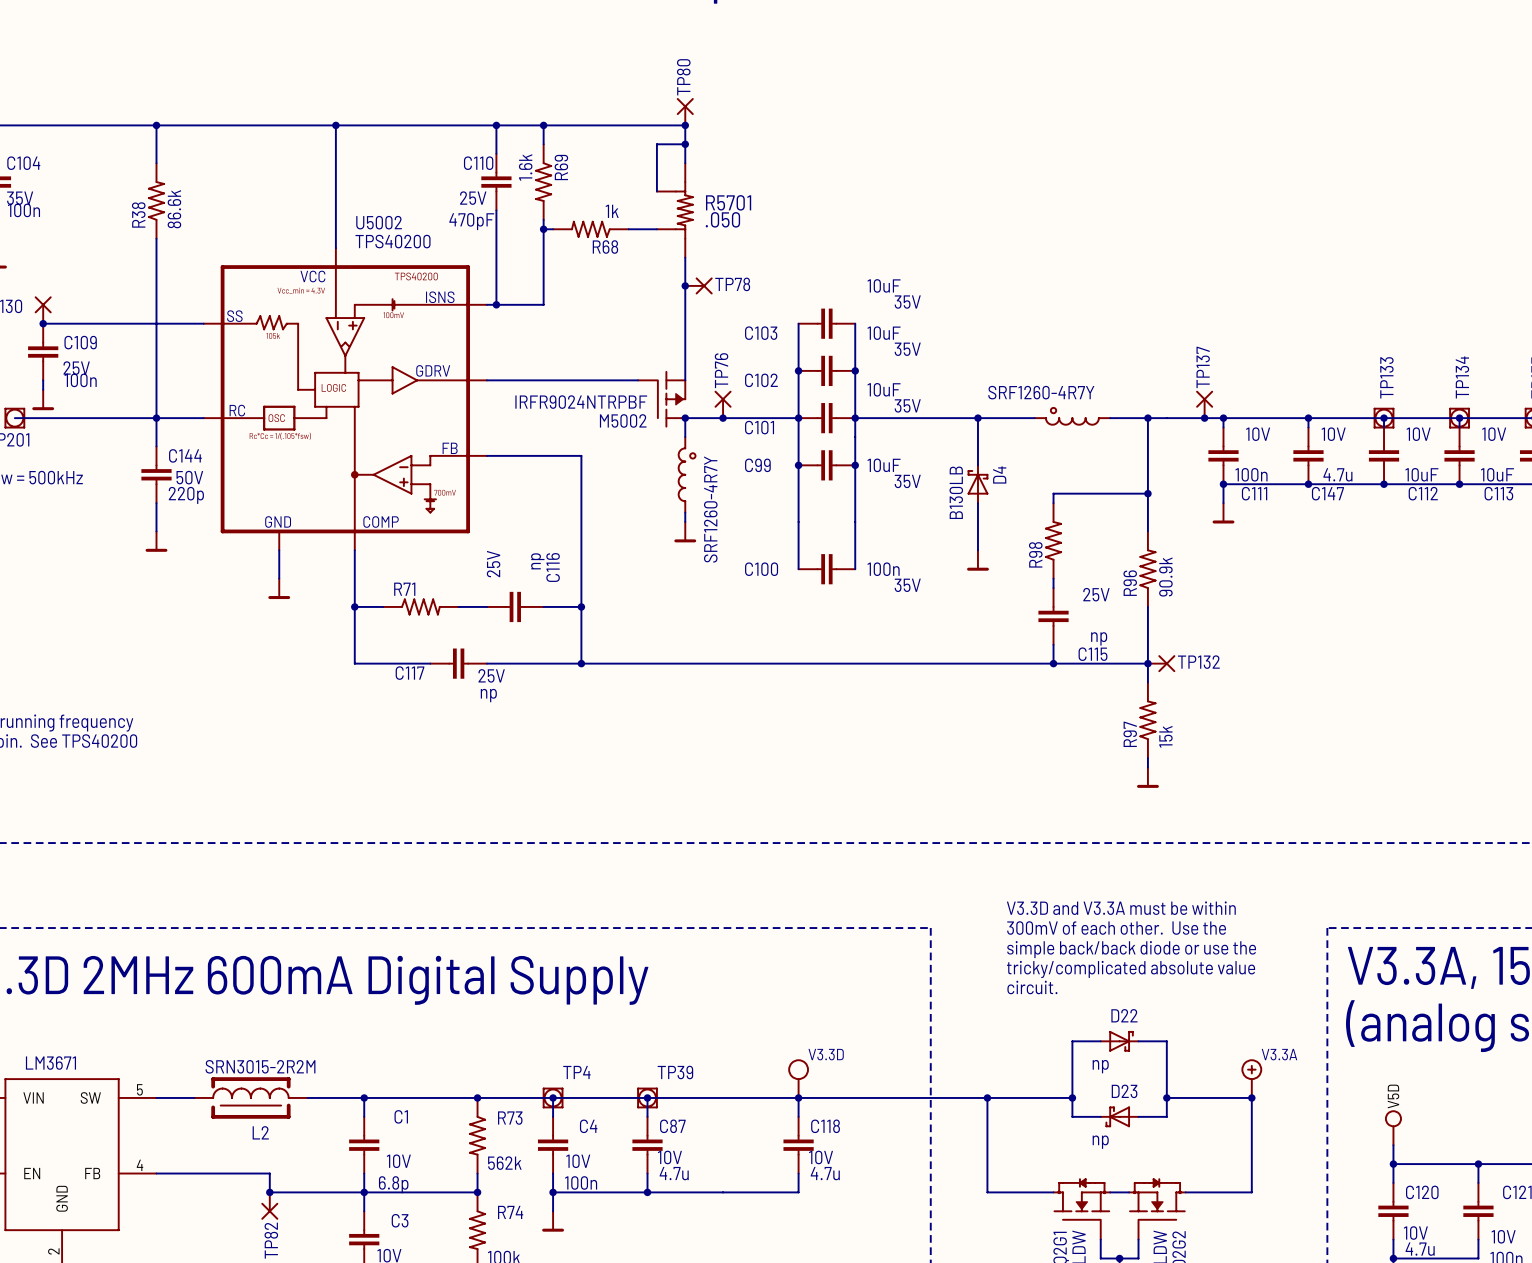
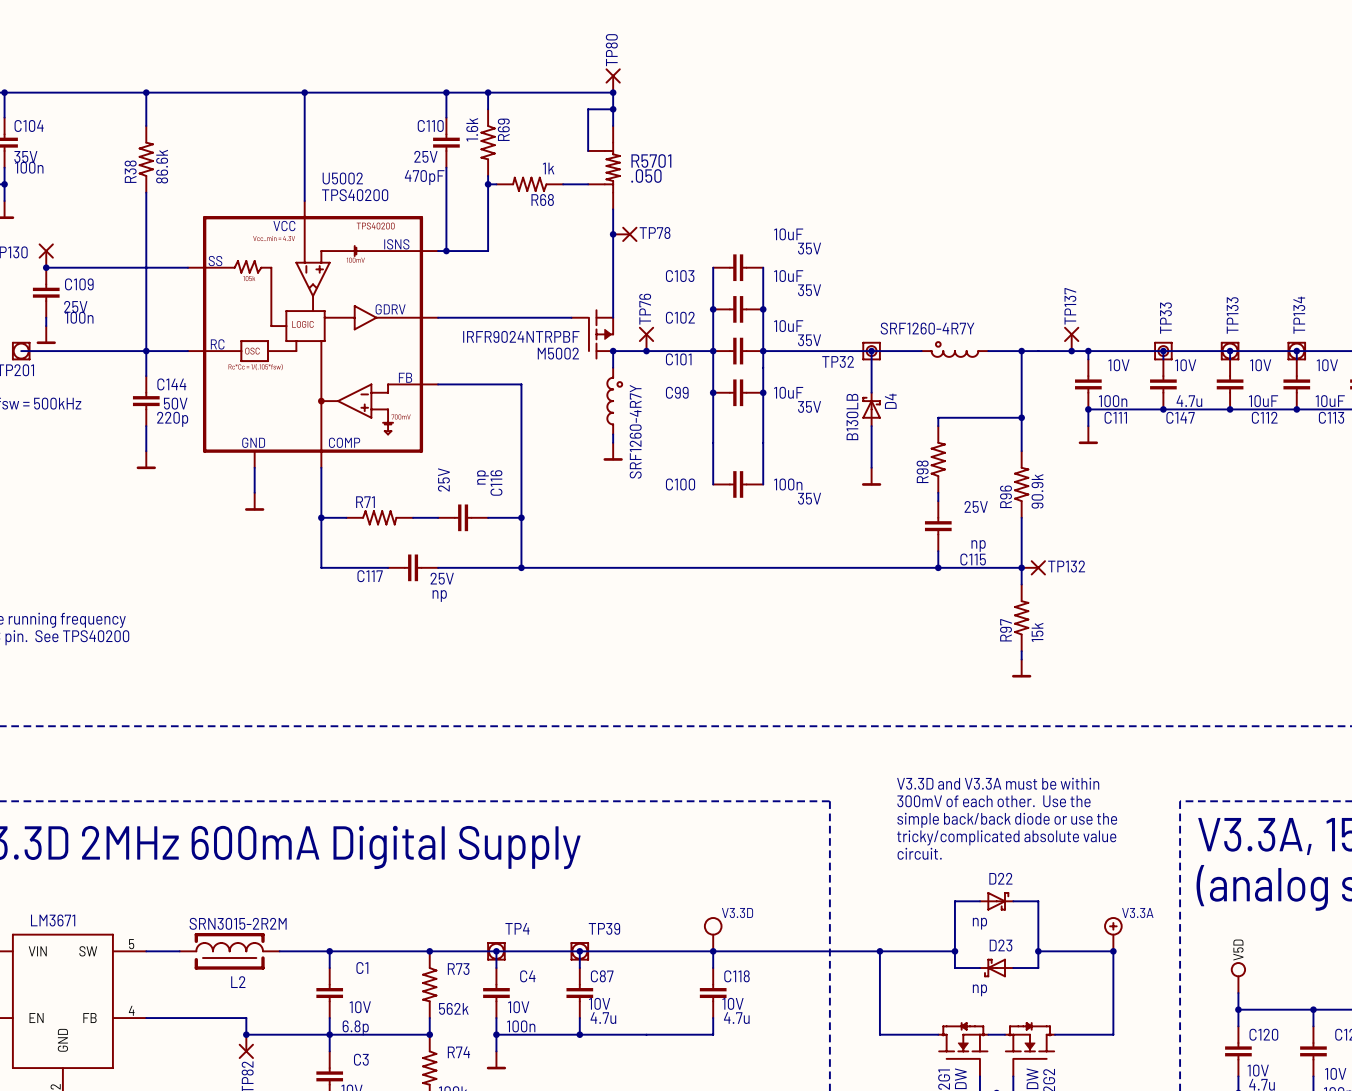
TP32: none -> (871, 351)
TP33: none -> (1163, 351)

